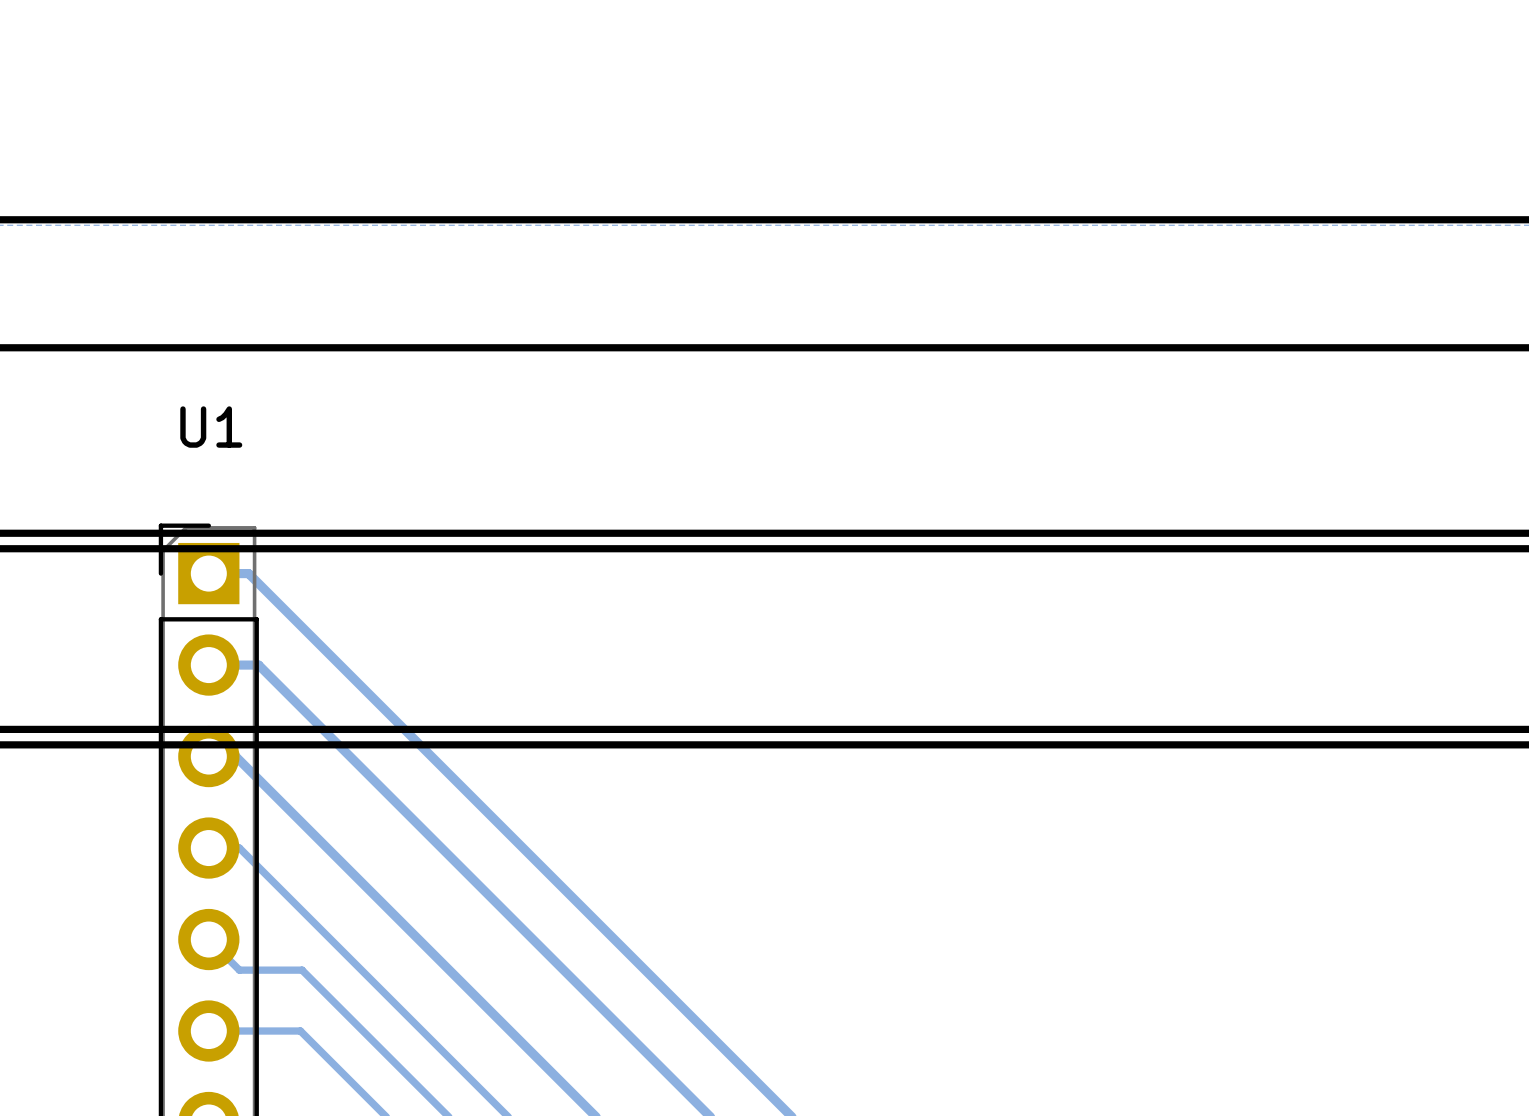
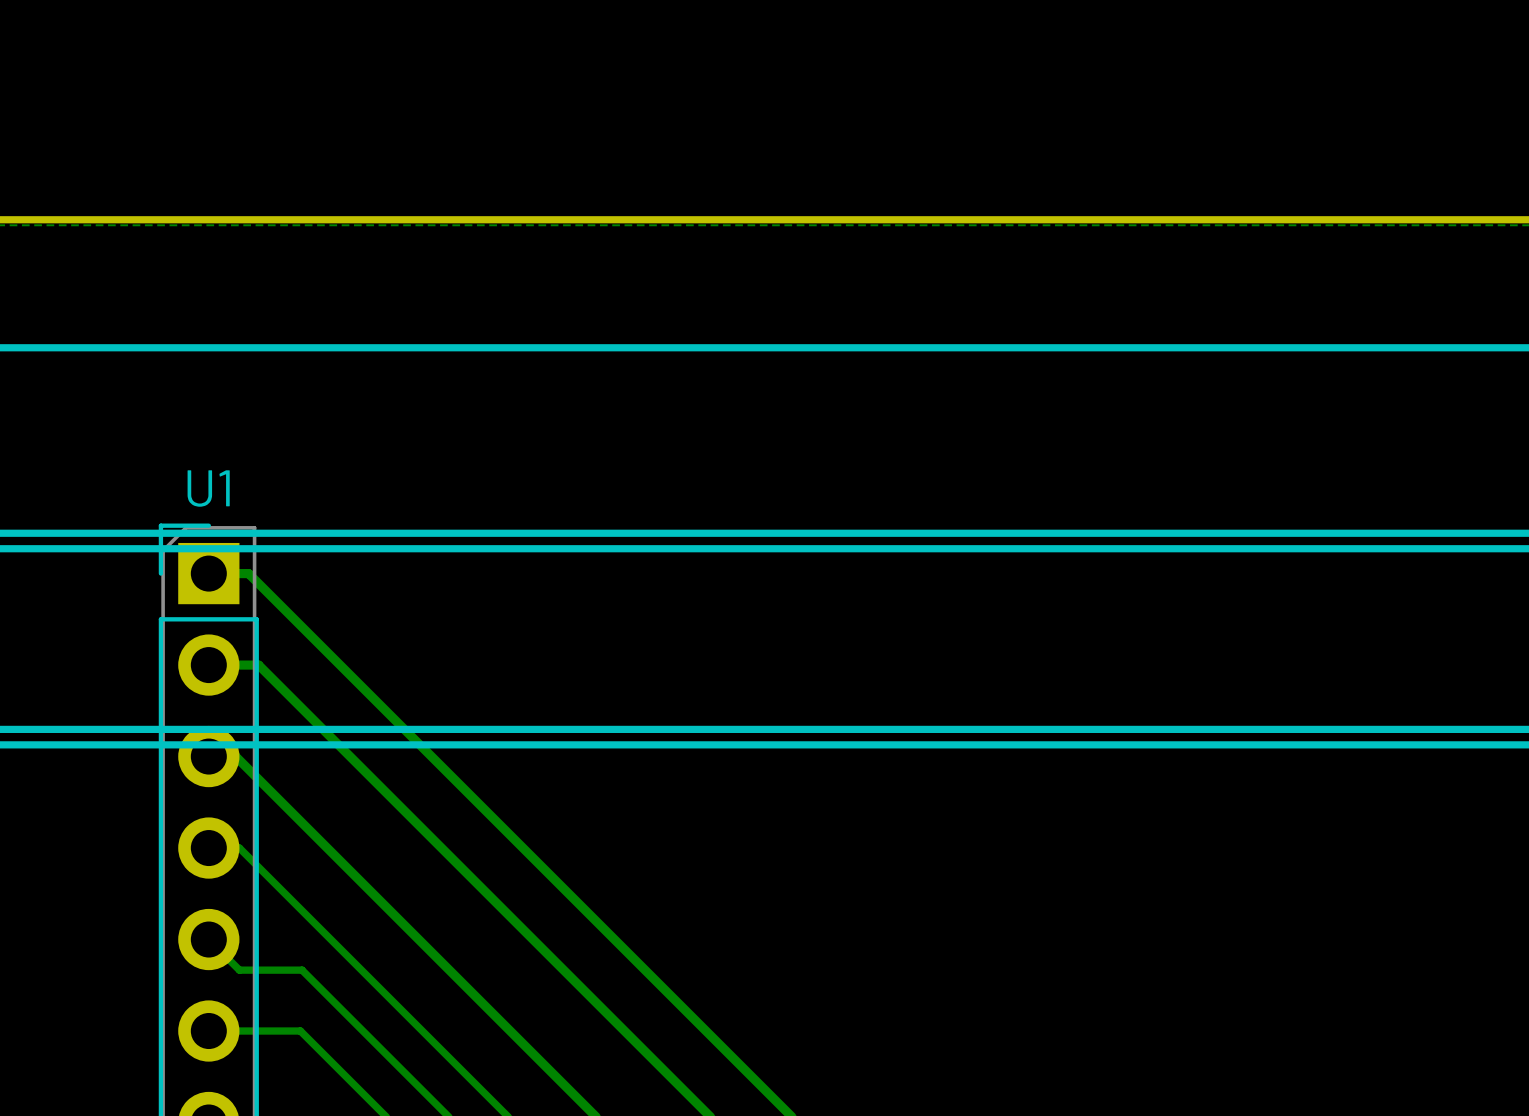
U1 name position: U1 (211, 427) -> U1 (208, 488)

